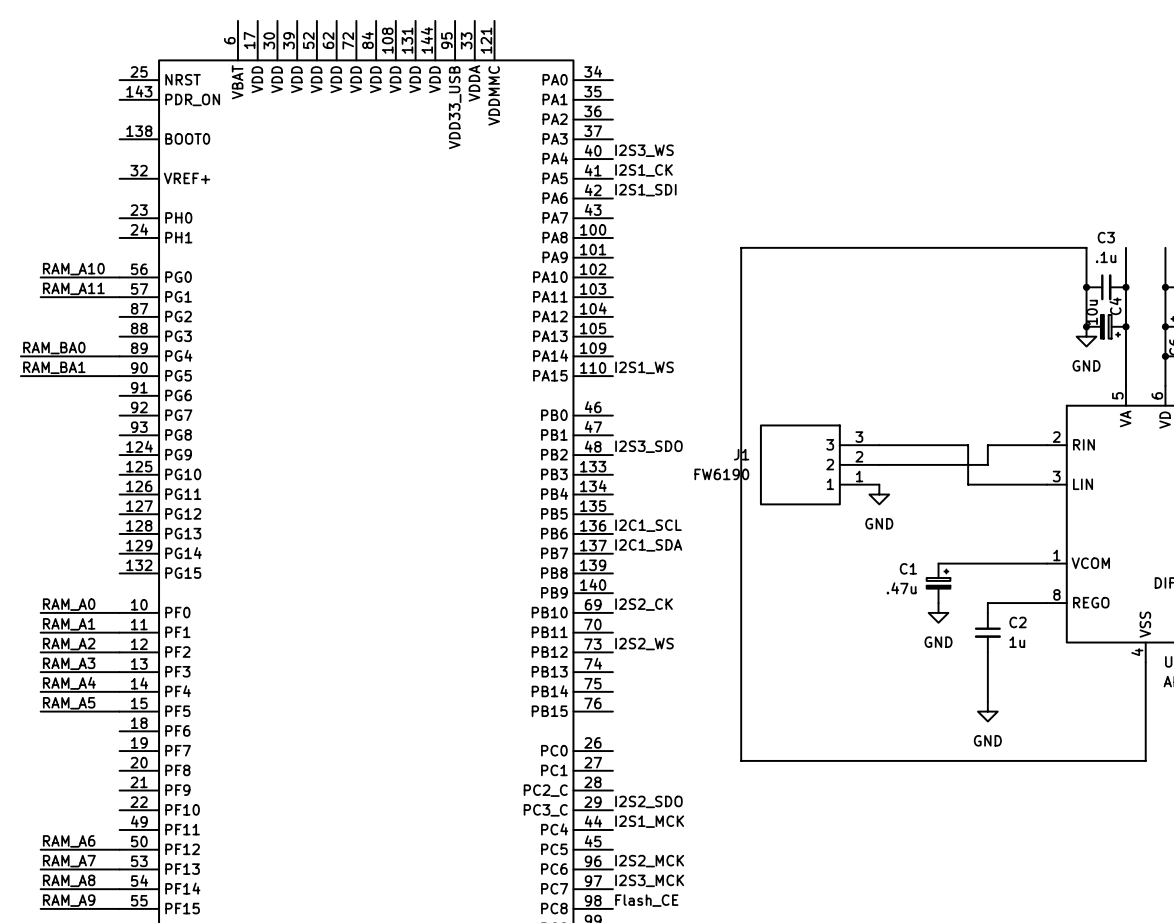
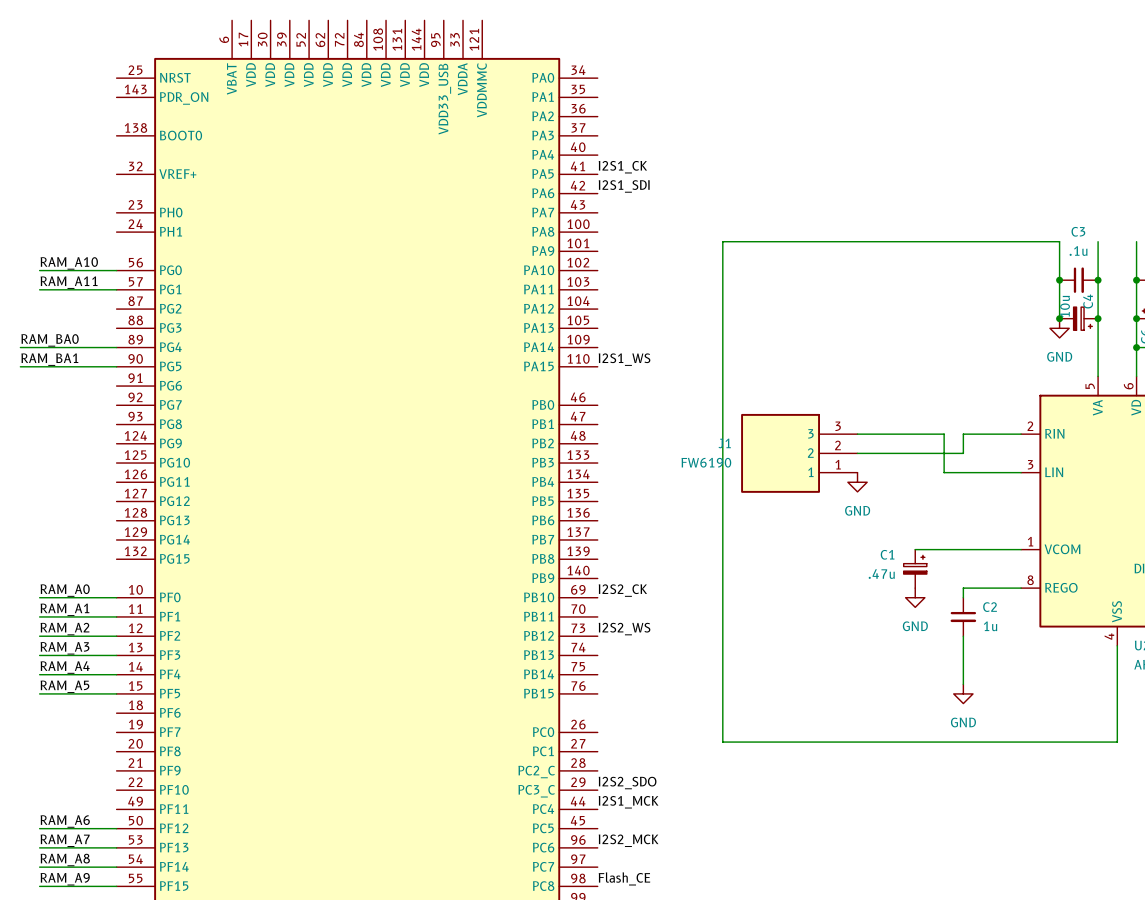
label: I2S3_WS (644, 150) -> none
label: I2S3_SDO (648, 446) -> none
label: I2C1_SCL (648, 525) -> none
label: I2C1_SDA (648, 545) -> none
label: I2S3_MCK (649, 880) -> none

